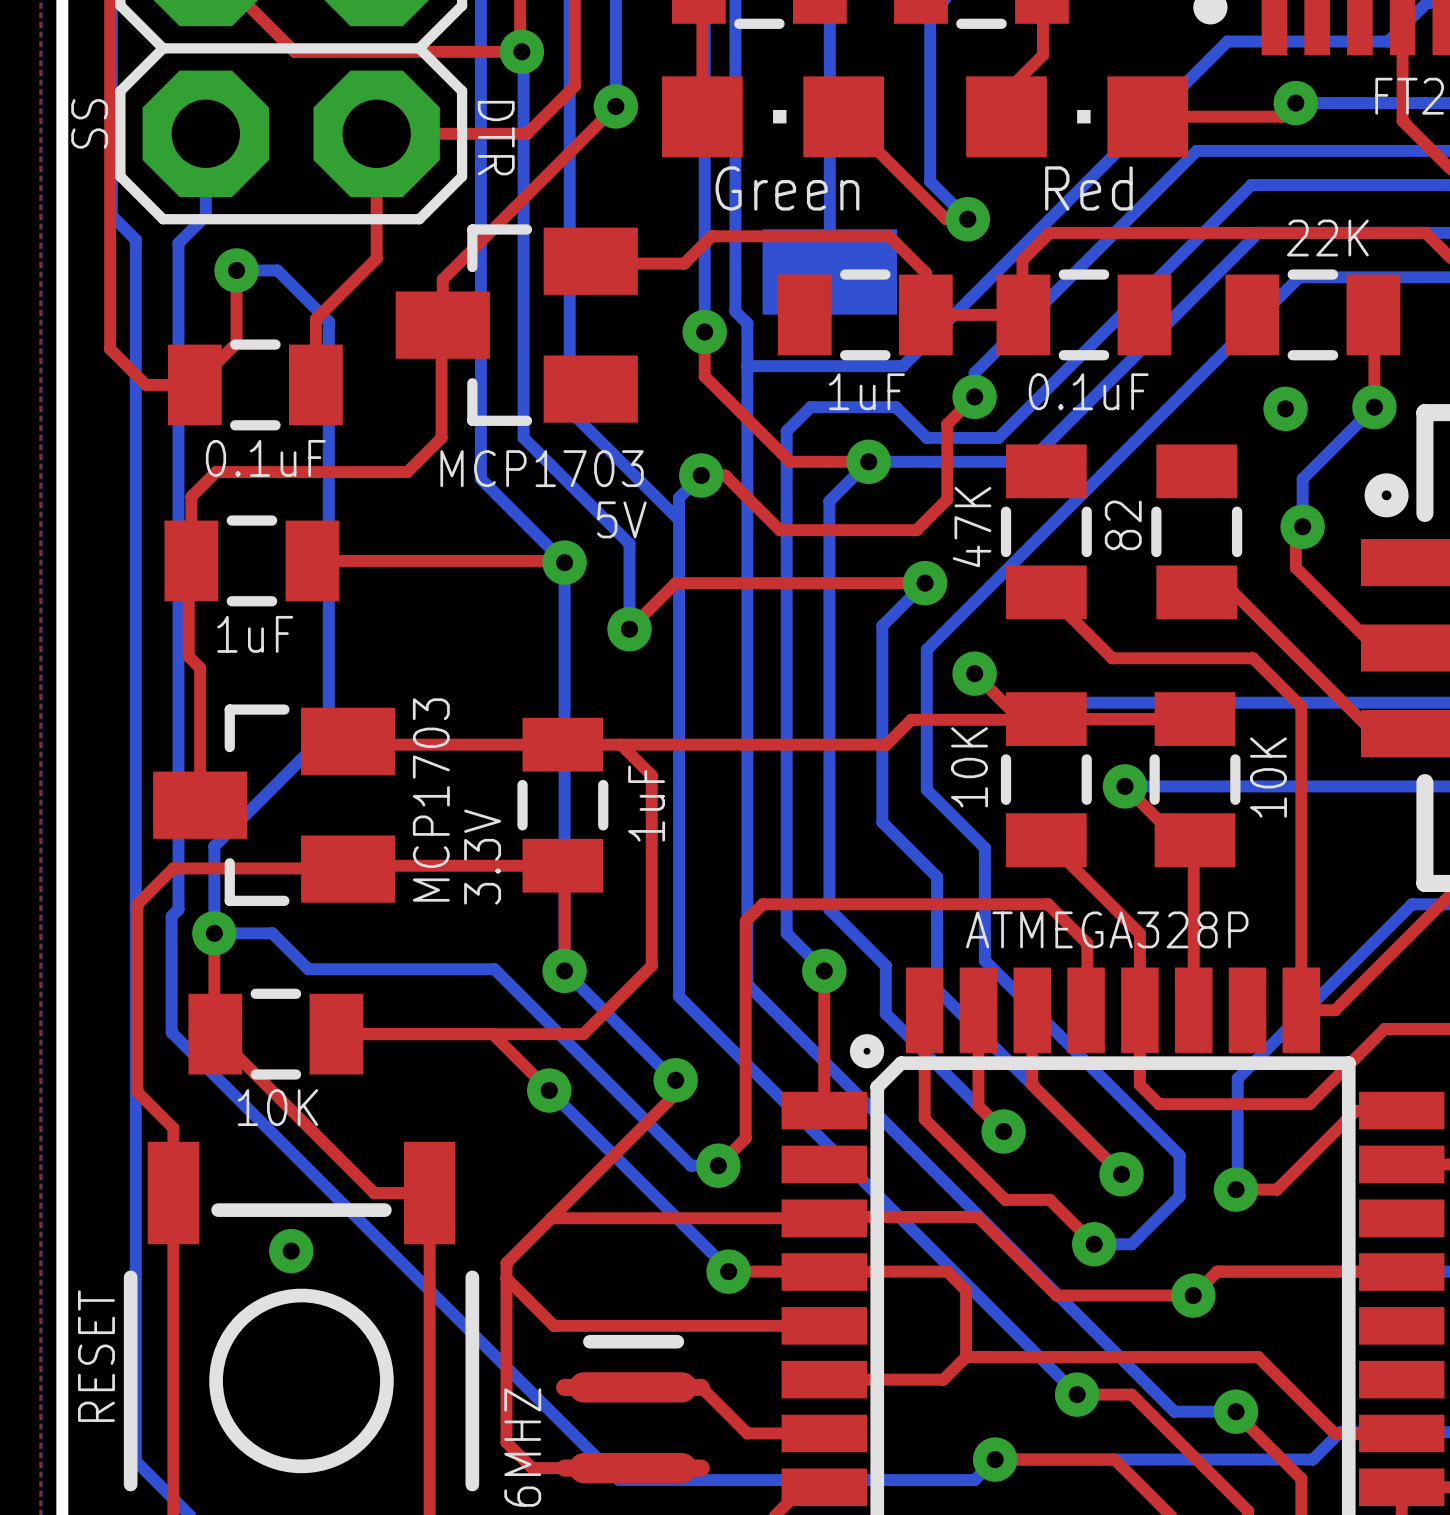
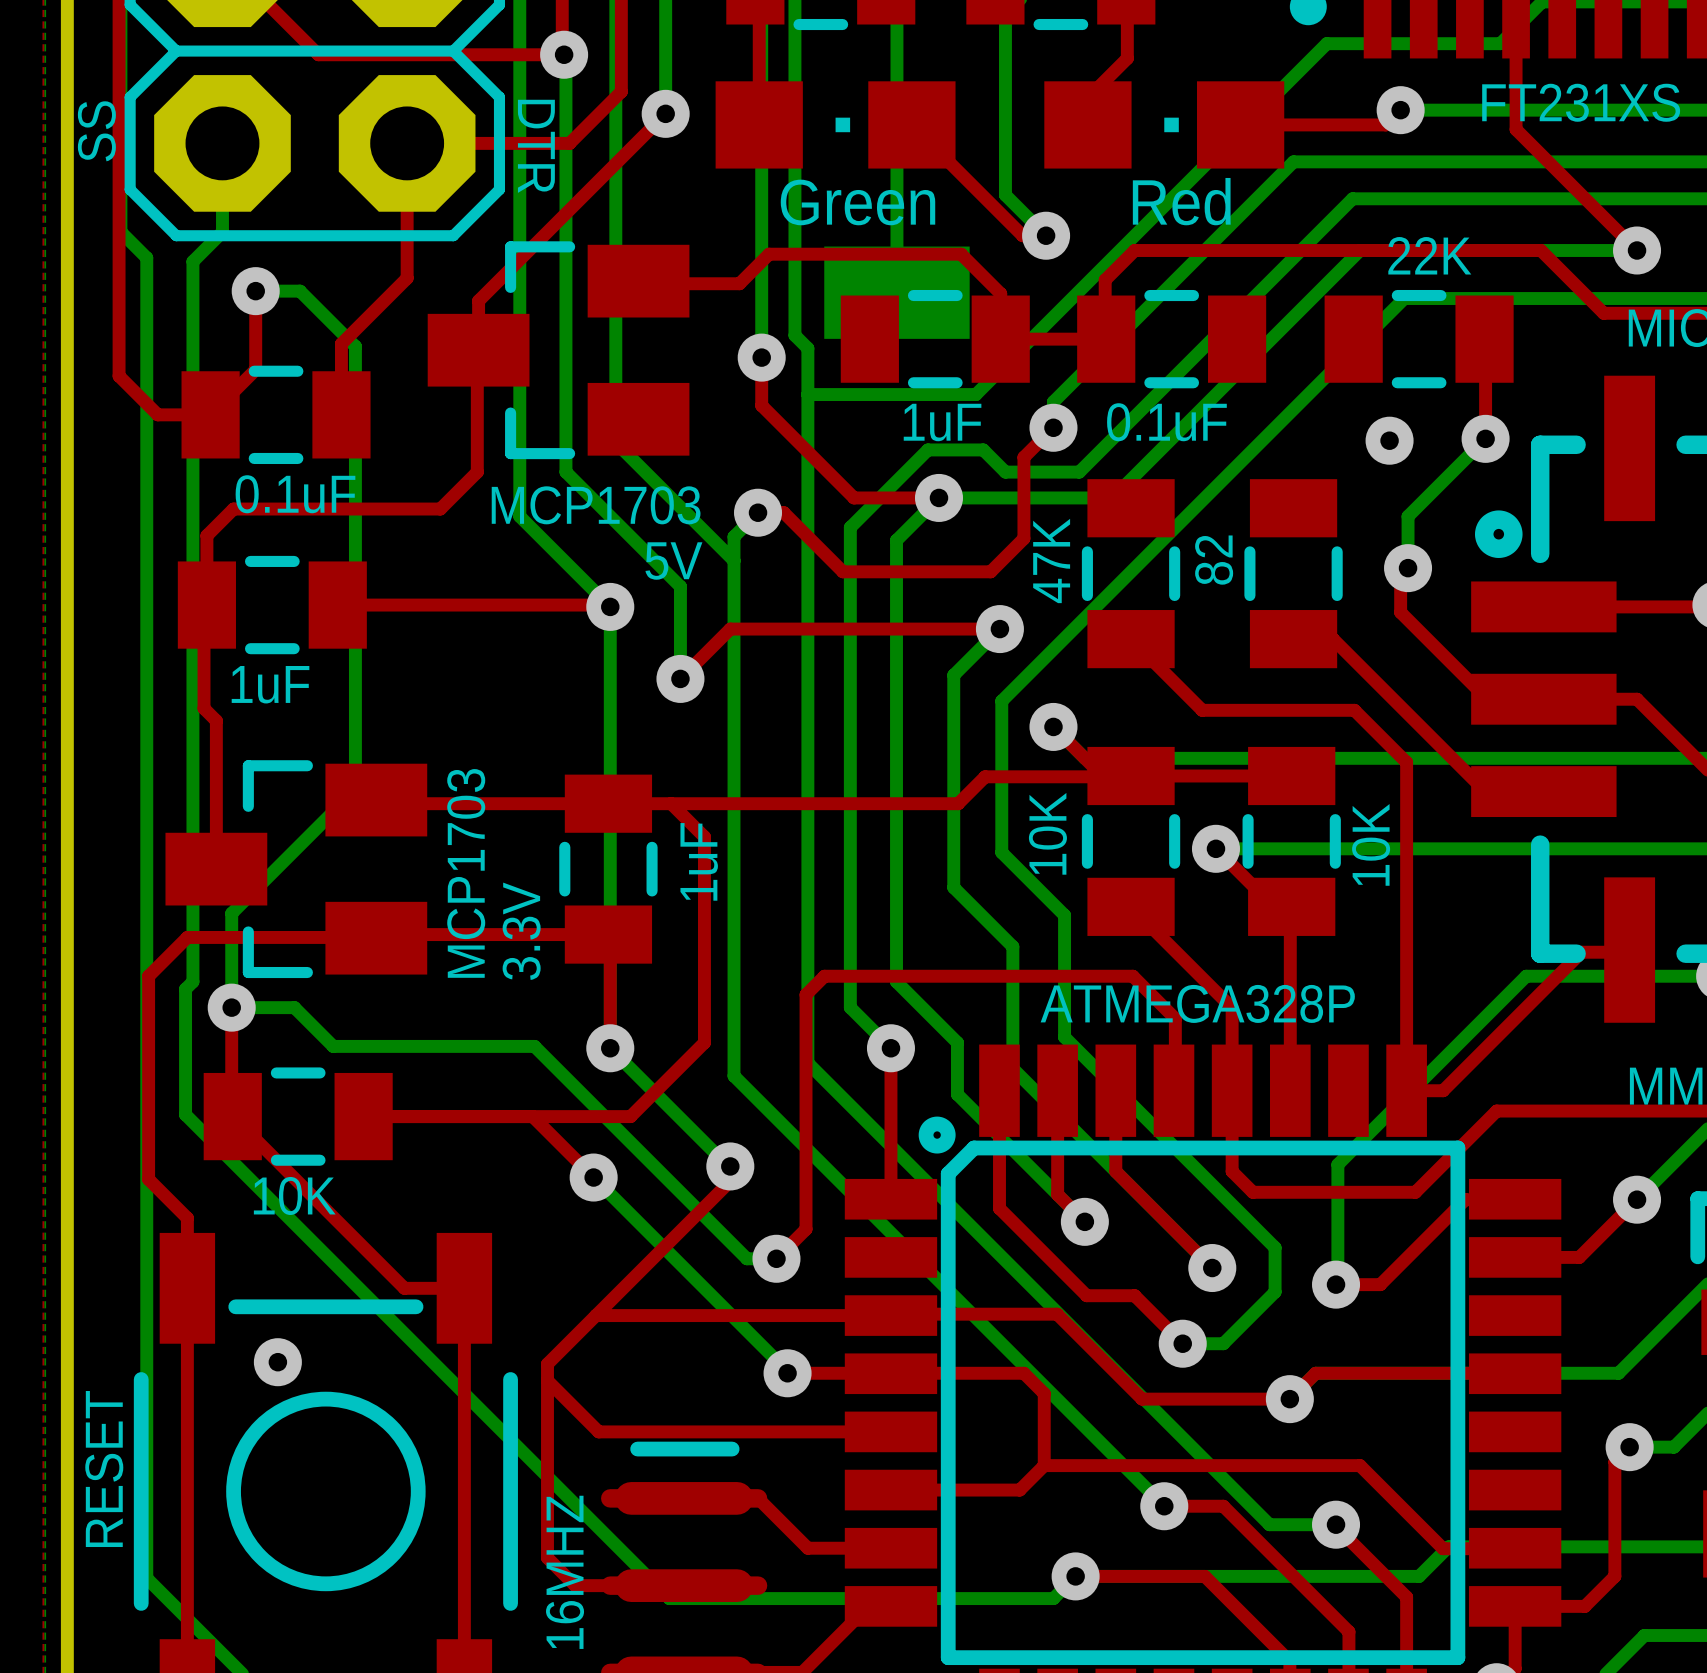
bottom track: (930, 437) (926, 437) (896, 407) (810, 407) (786, 431) (786, 489) -> (1005, 472) (983, 449) (927, 449) (850, 527)
via position: (291, 1251) -> (277, 1362)

